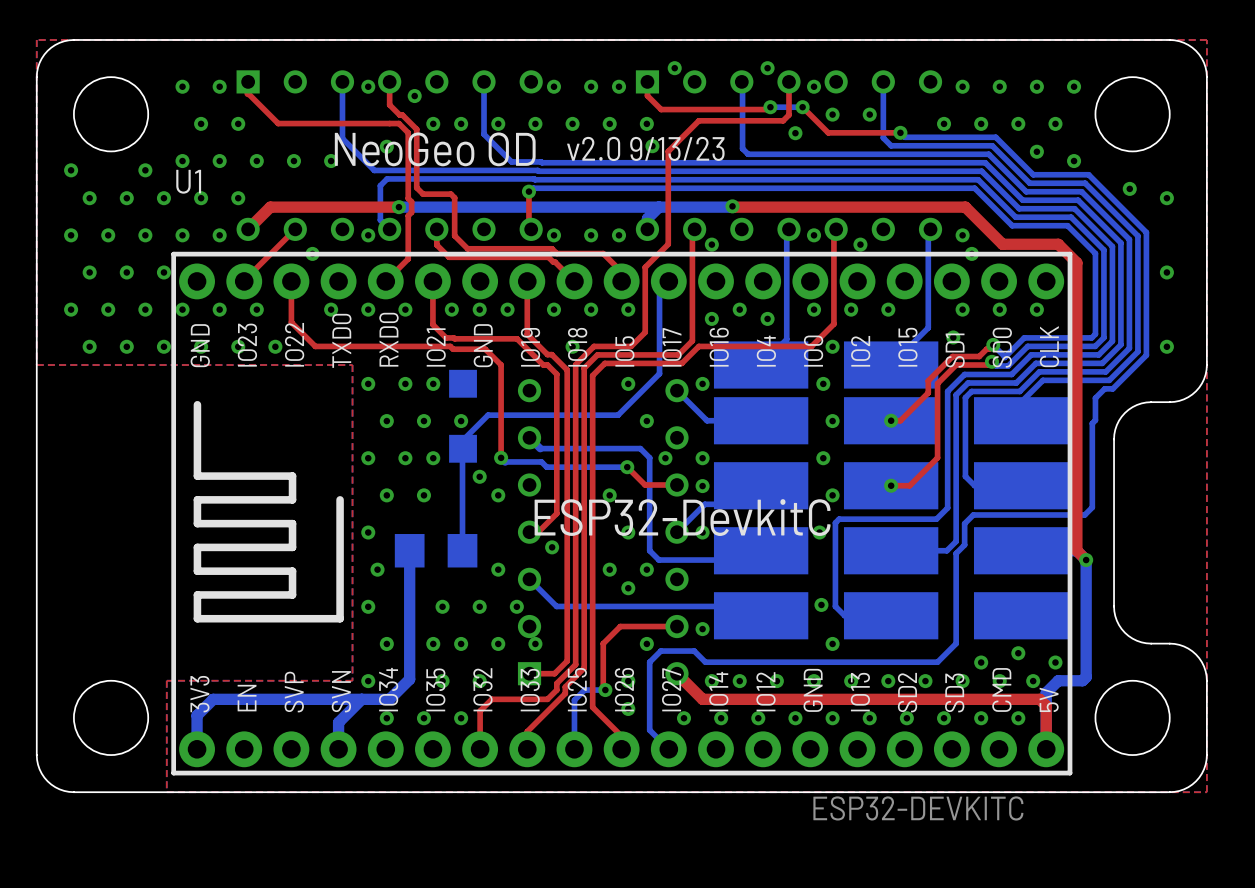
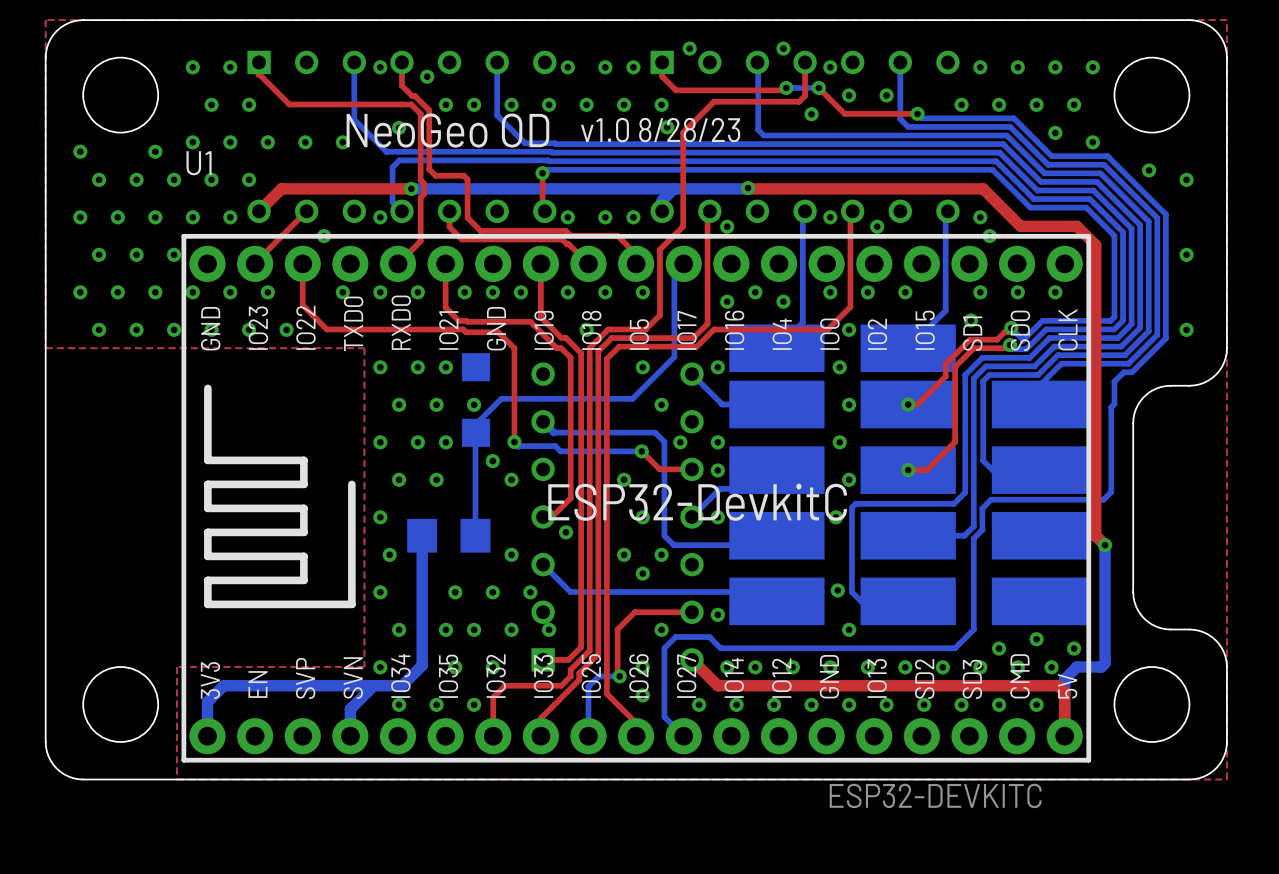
text: v2.0 9/13/23 (645, 148) -> v1.0 8/28/23 (660, 130)

